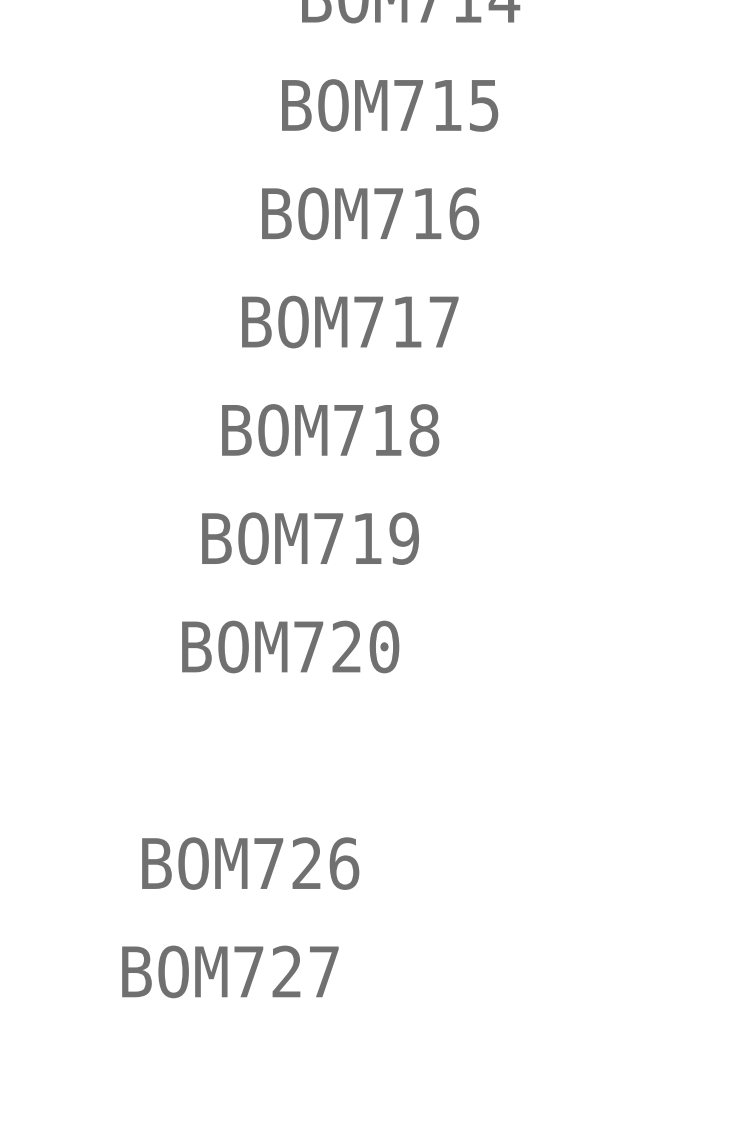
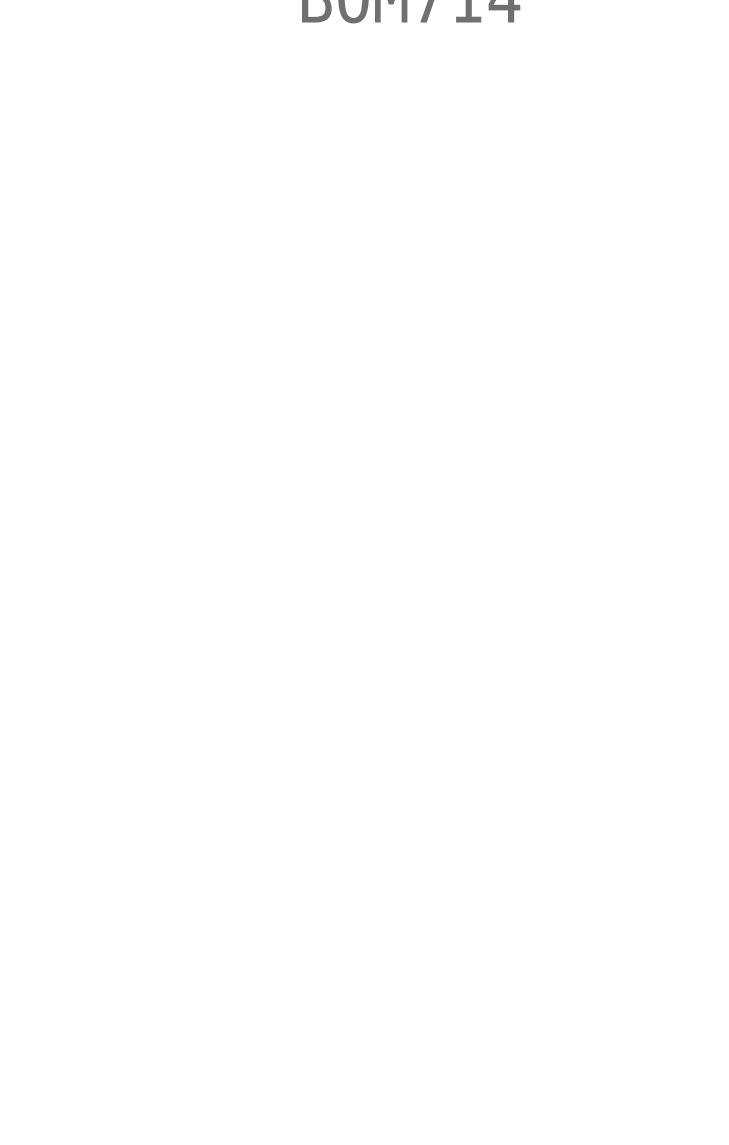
BOM715: (390, 105) -> none
BOM716: (370, 213) -> none
BOM717: (350, 322) -> none
BOM718: (330, 430) -> none
BOM719: (310, 538) -> none
BOM720: (290, 647) -> none
BOM726: (250, 863) -> none
BOM727: (230, 971) -> none

